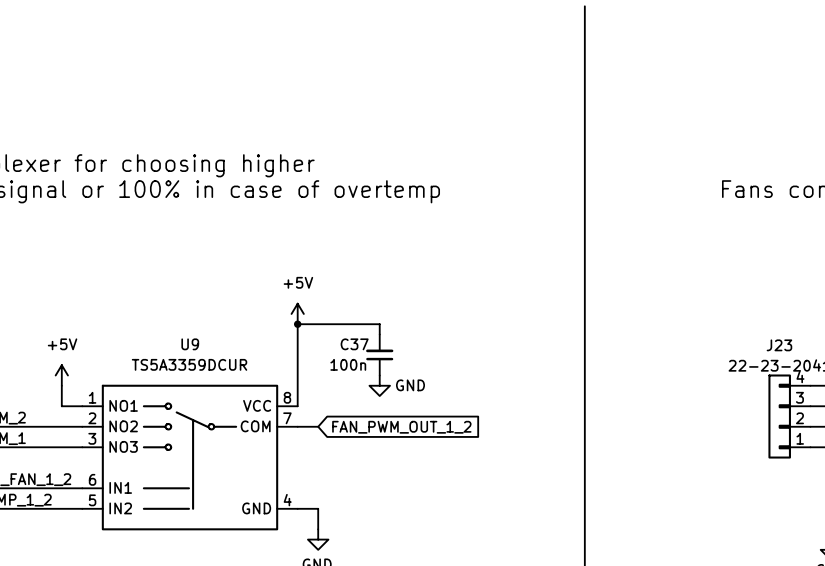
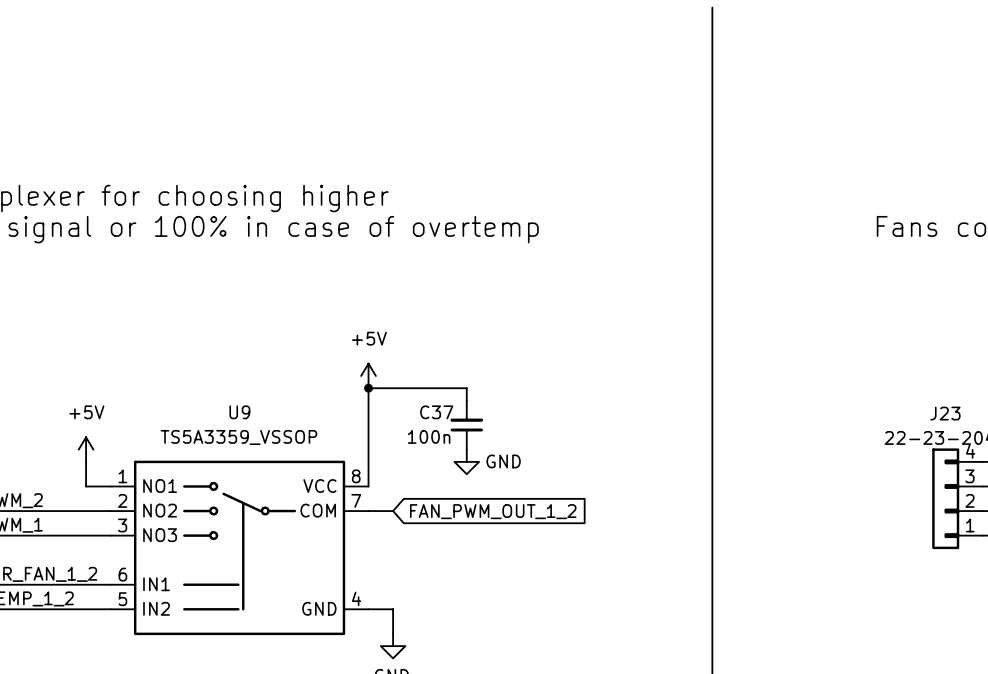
U9 text: TS5A3359DCUR (189, 364) -> none
U9 value: none -> TS5A3359_VSSOP (238, 437)

